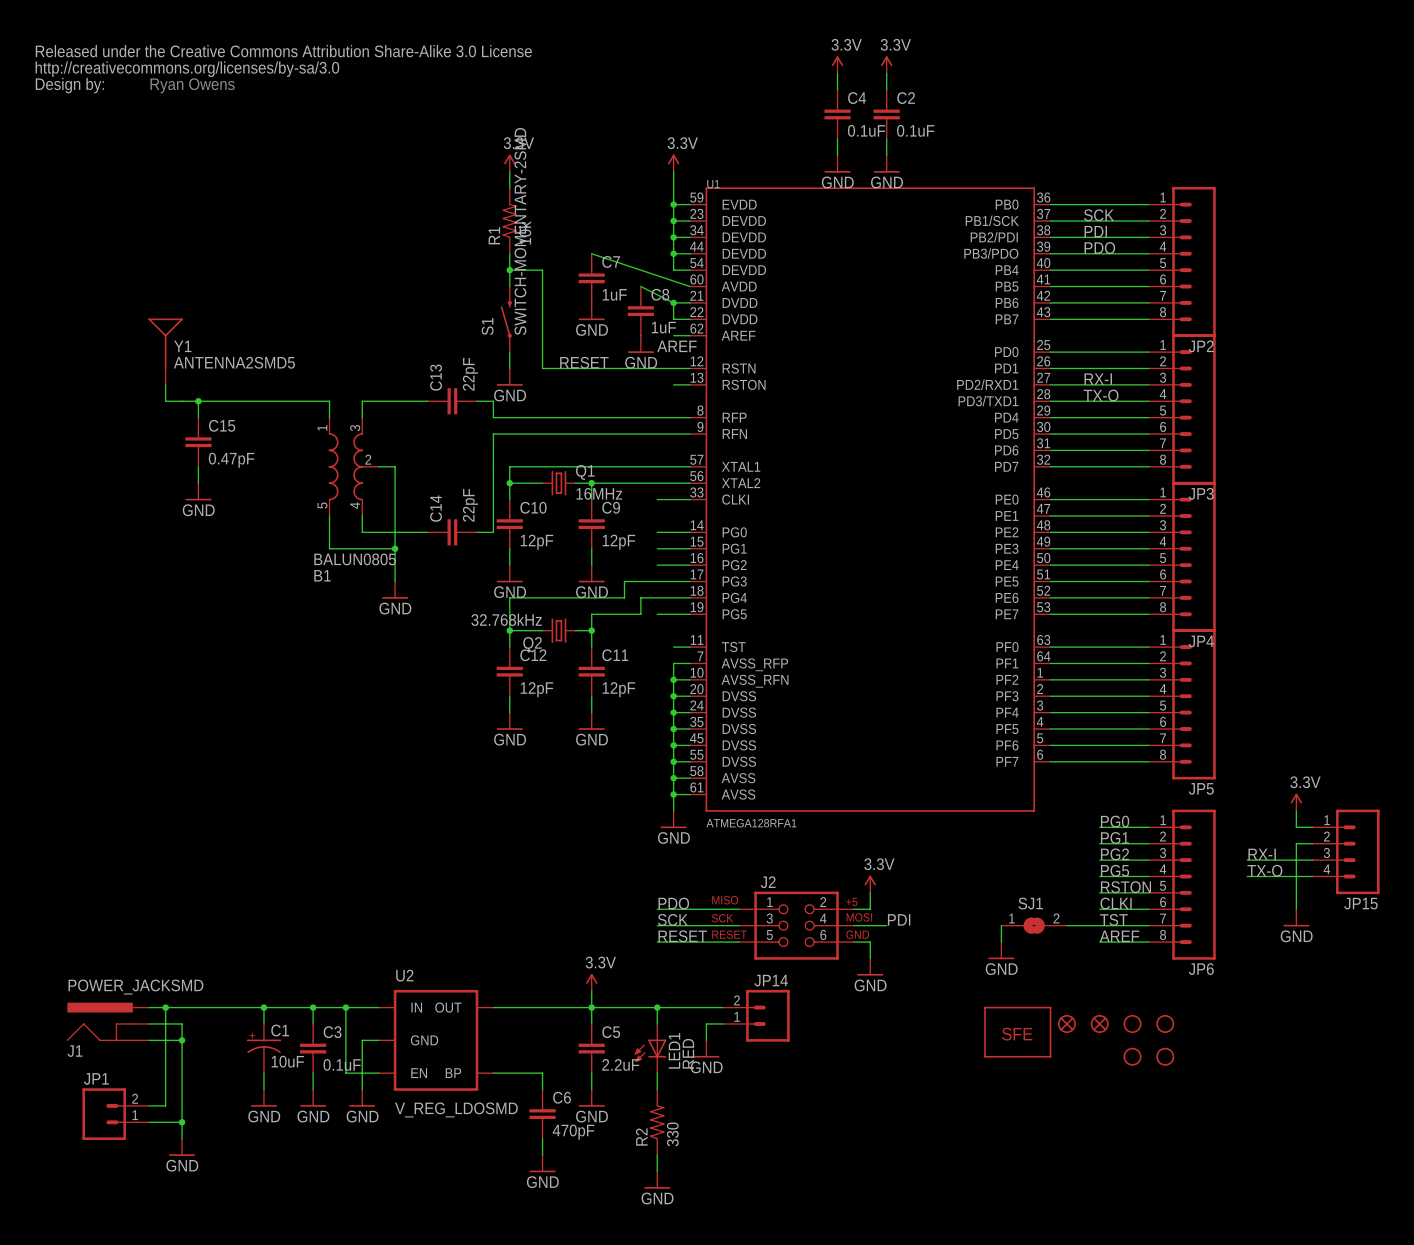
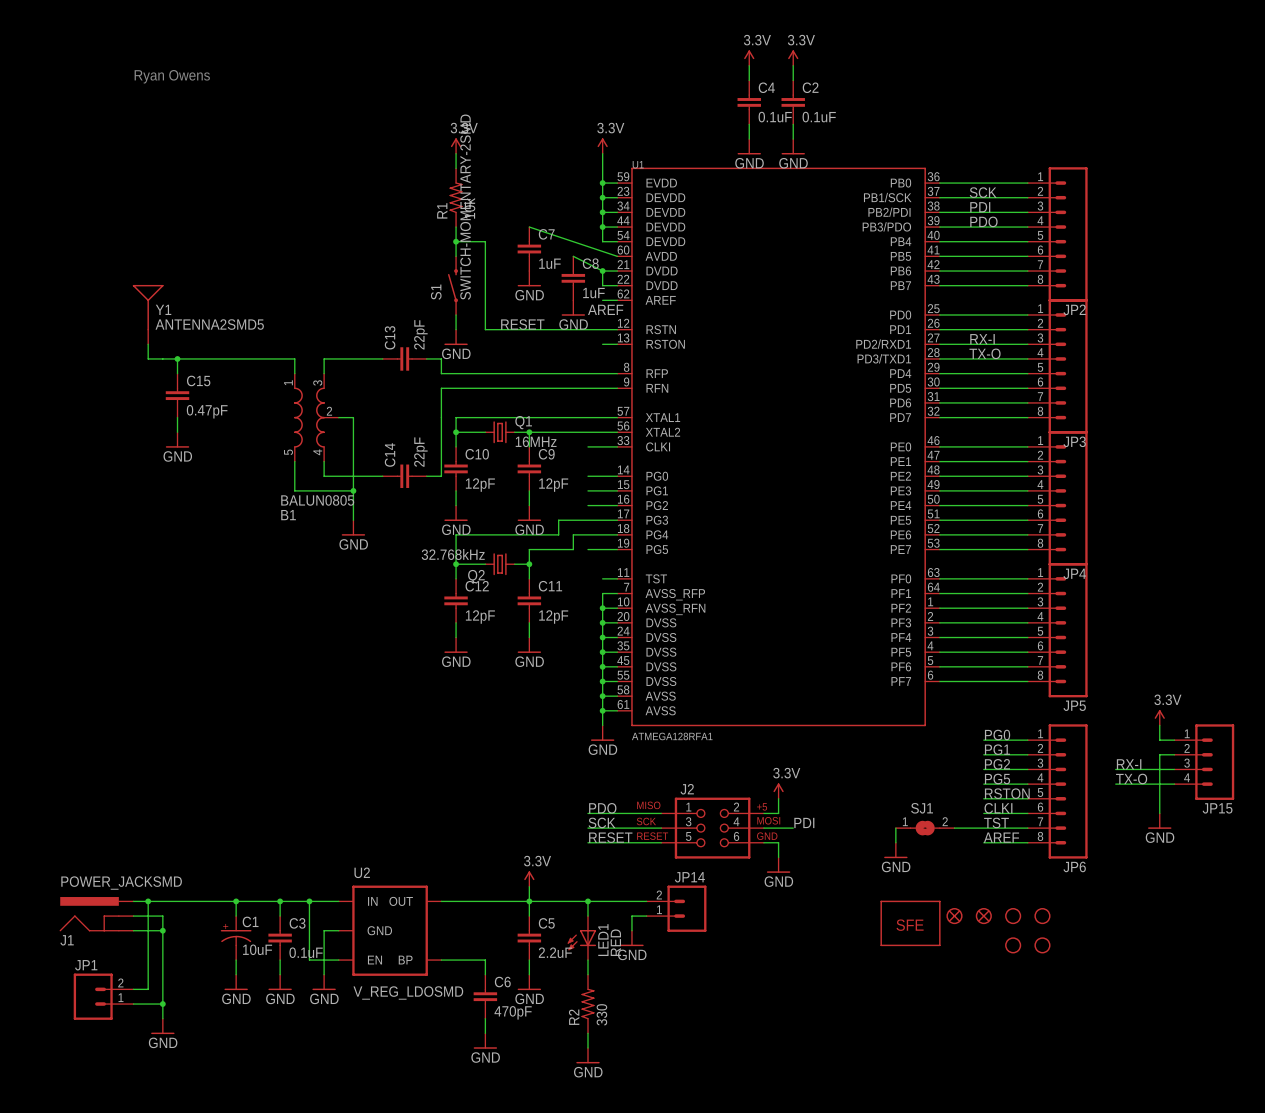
part: (283, 69) -> none

